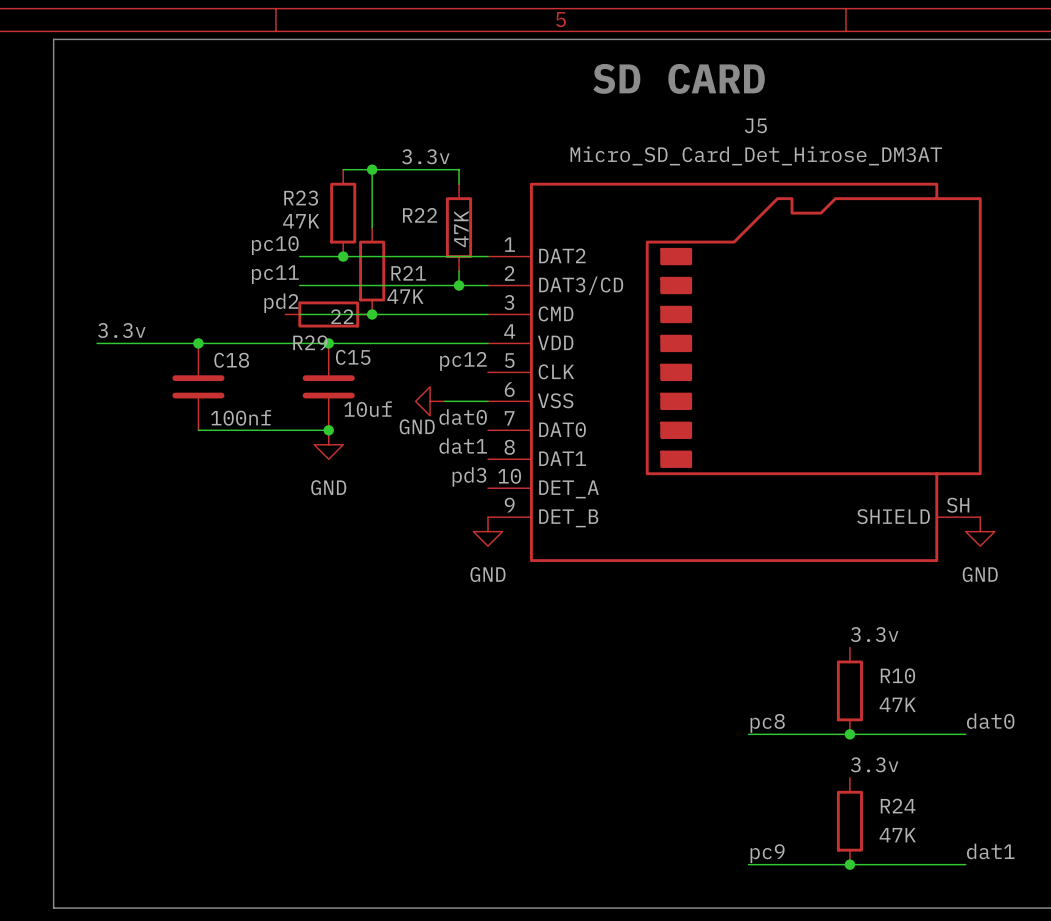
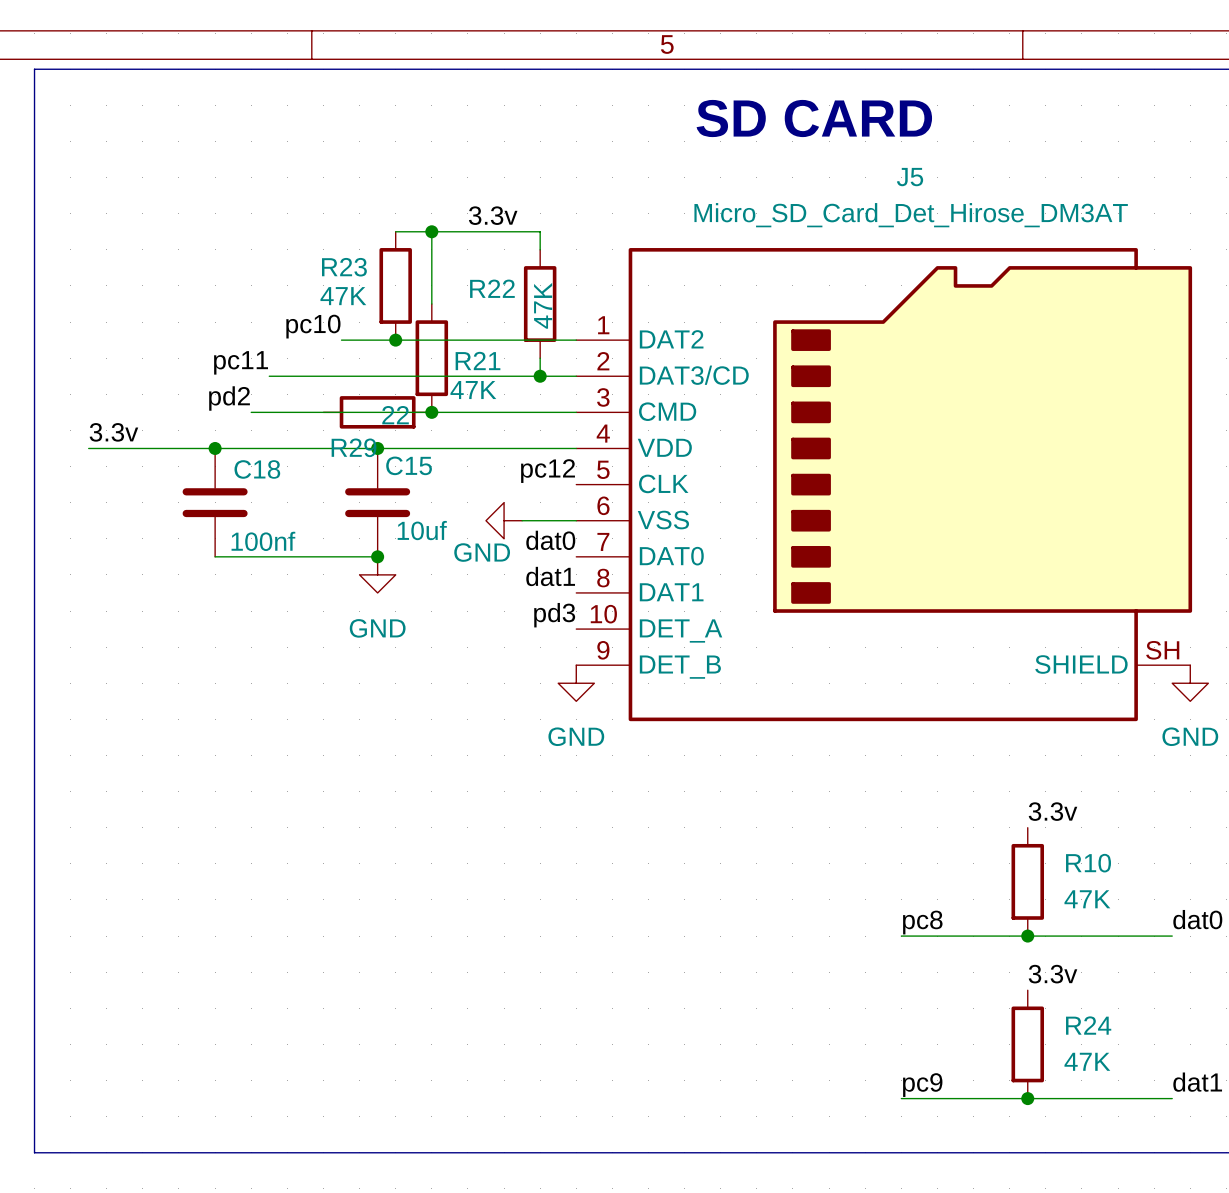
label position: pc11 (275, 274) -> pc11 (241, 362)
wire: none -> (269, 376) (341, 376)
label position: pd2 (281, 303) -> pd2 (229, 398)
wire: none -> (251, 412) (341, 412)

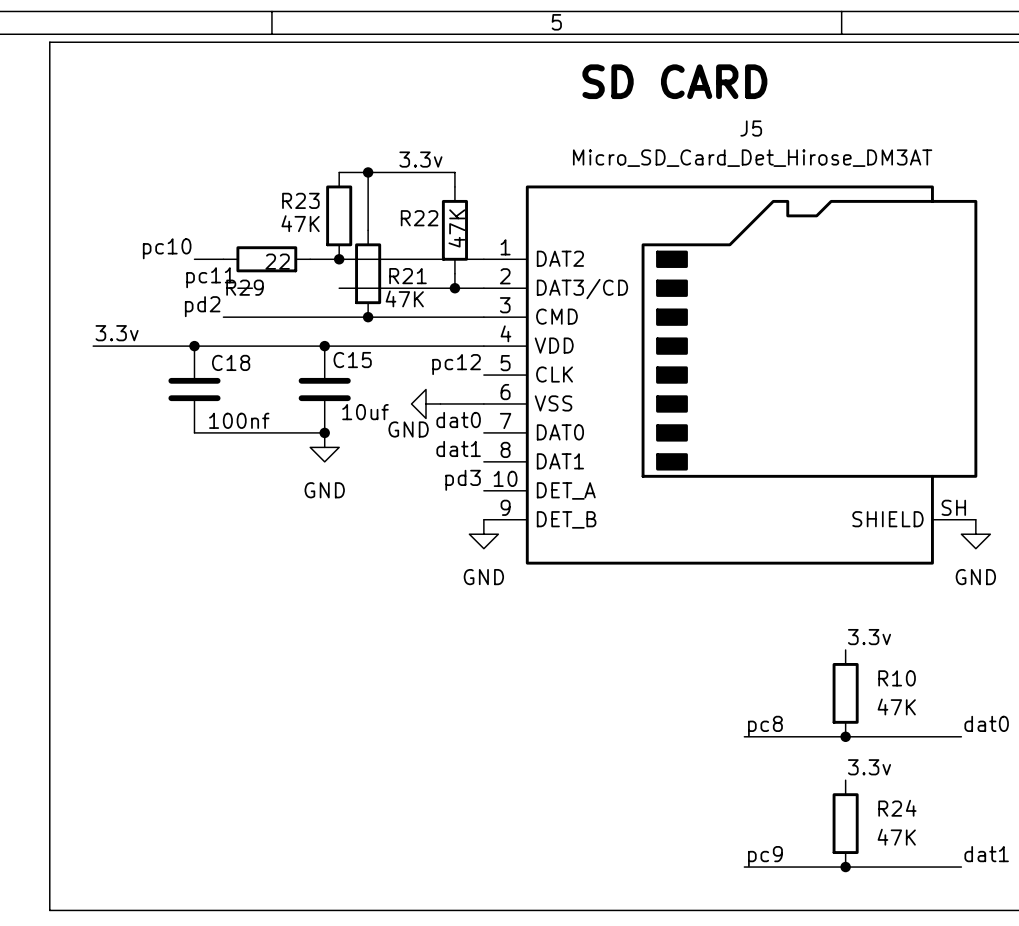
label position: pc10 (313, 326) -> pc10 (167, 248)
wire: none -> (194, 259) (223, 259)
wire: (287, 376) (395, 376) -> none
R29 position: (377, 412) -> (266, 259)

